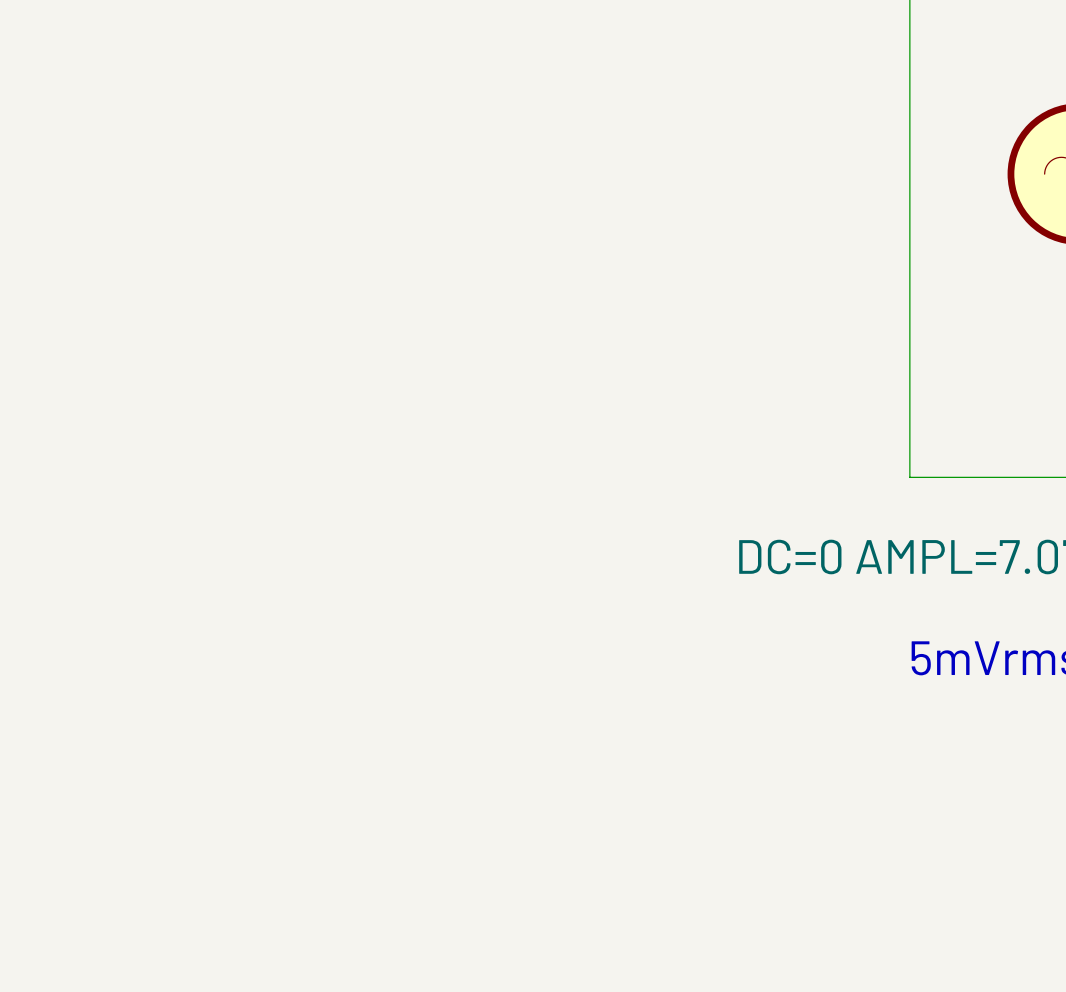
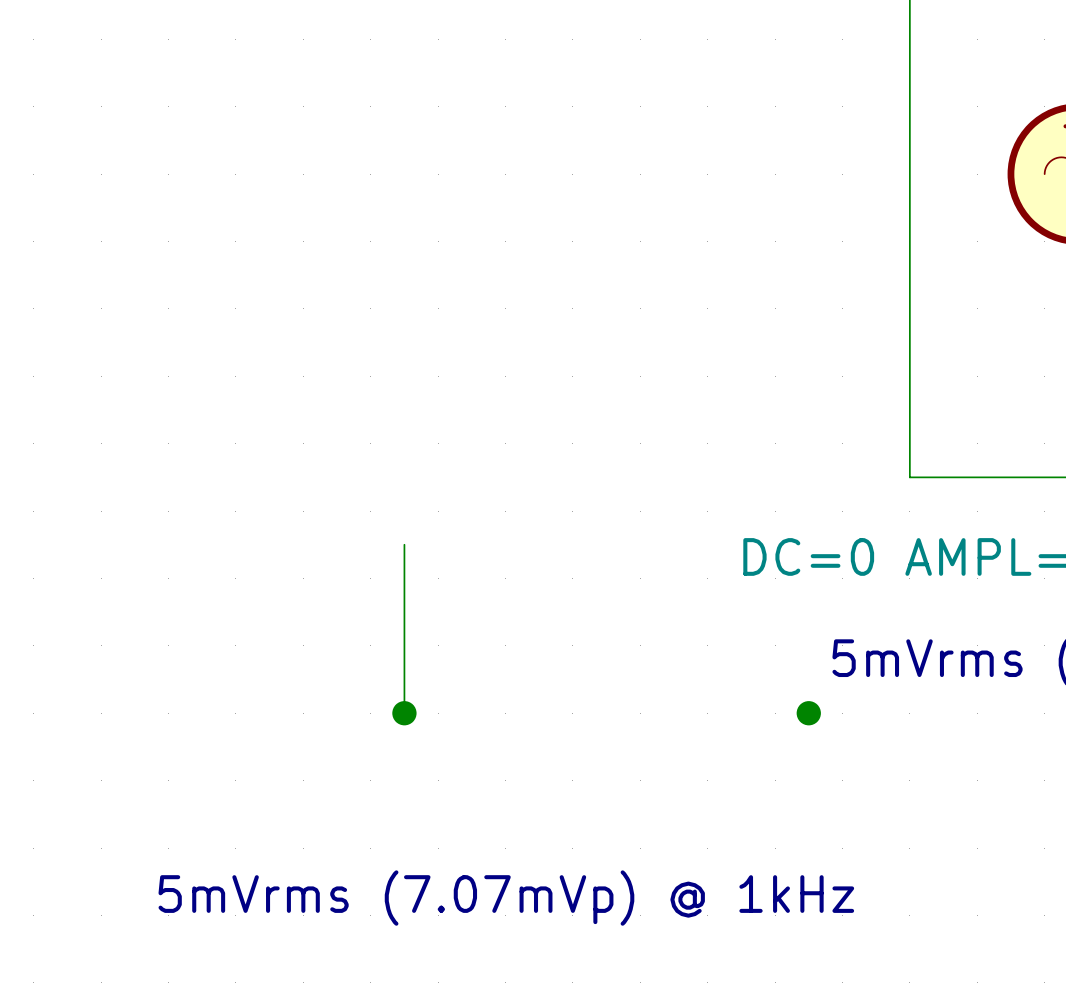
wire: none -> (404, 544) (404, 713)
junction: none -> (404, 713)
junction: none -> (808, 713)
text: none -> 5mVrms (7.07mVp) @ 1kHz (506, 898)

